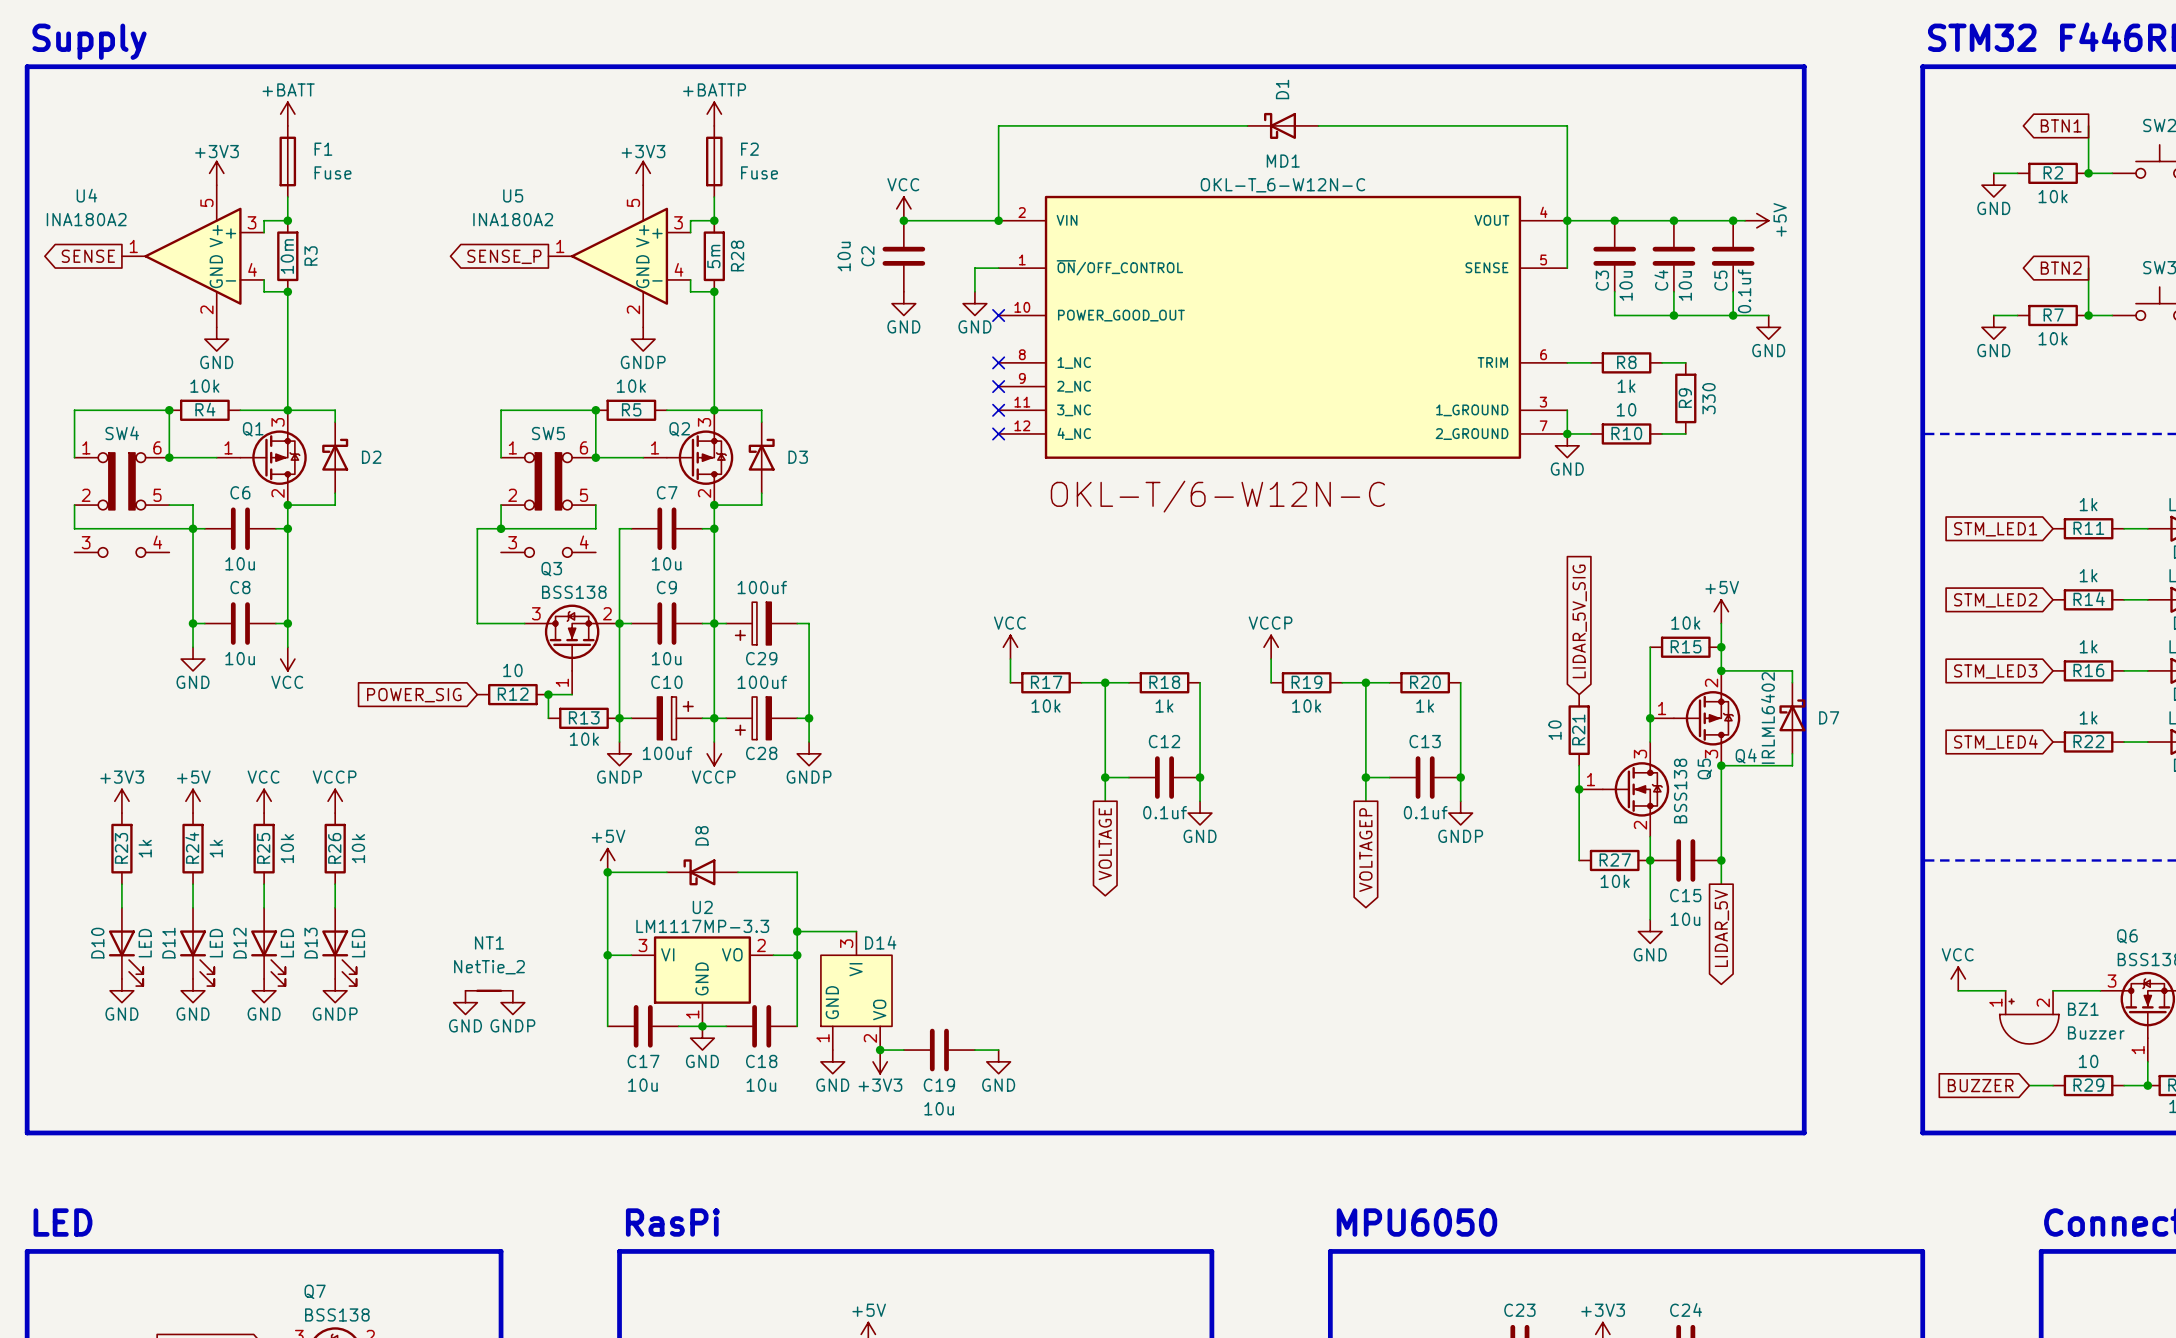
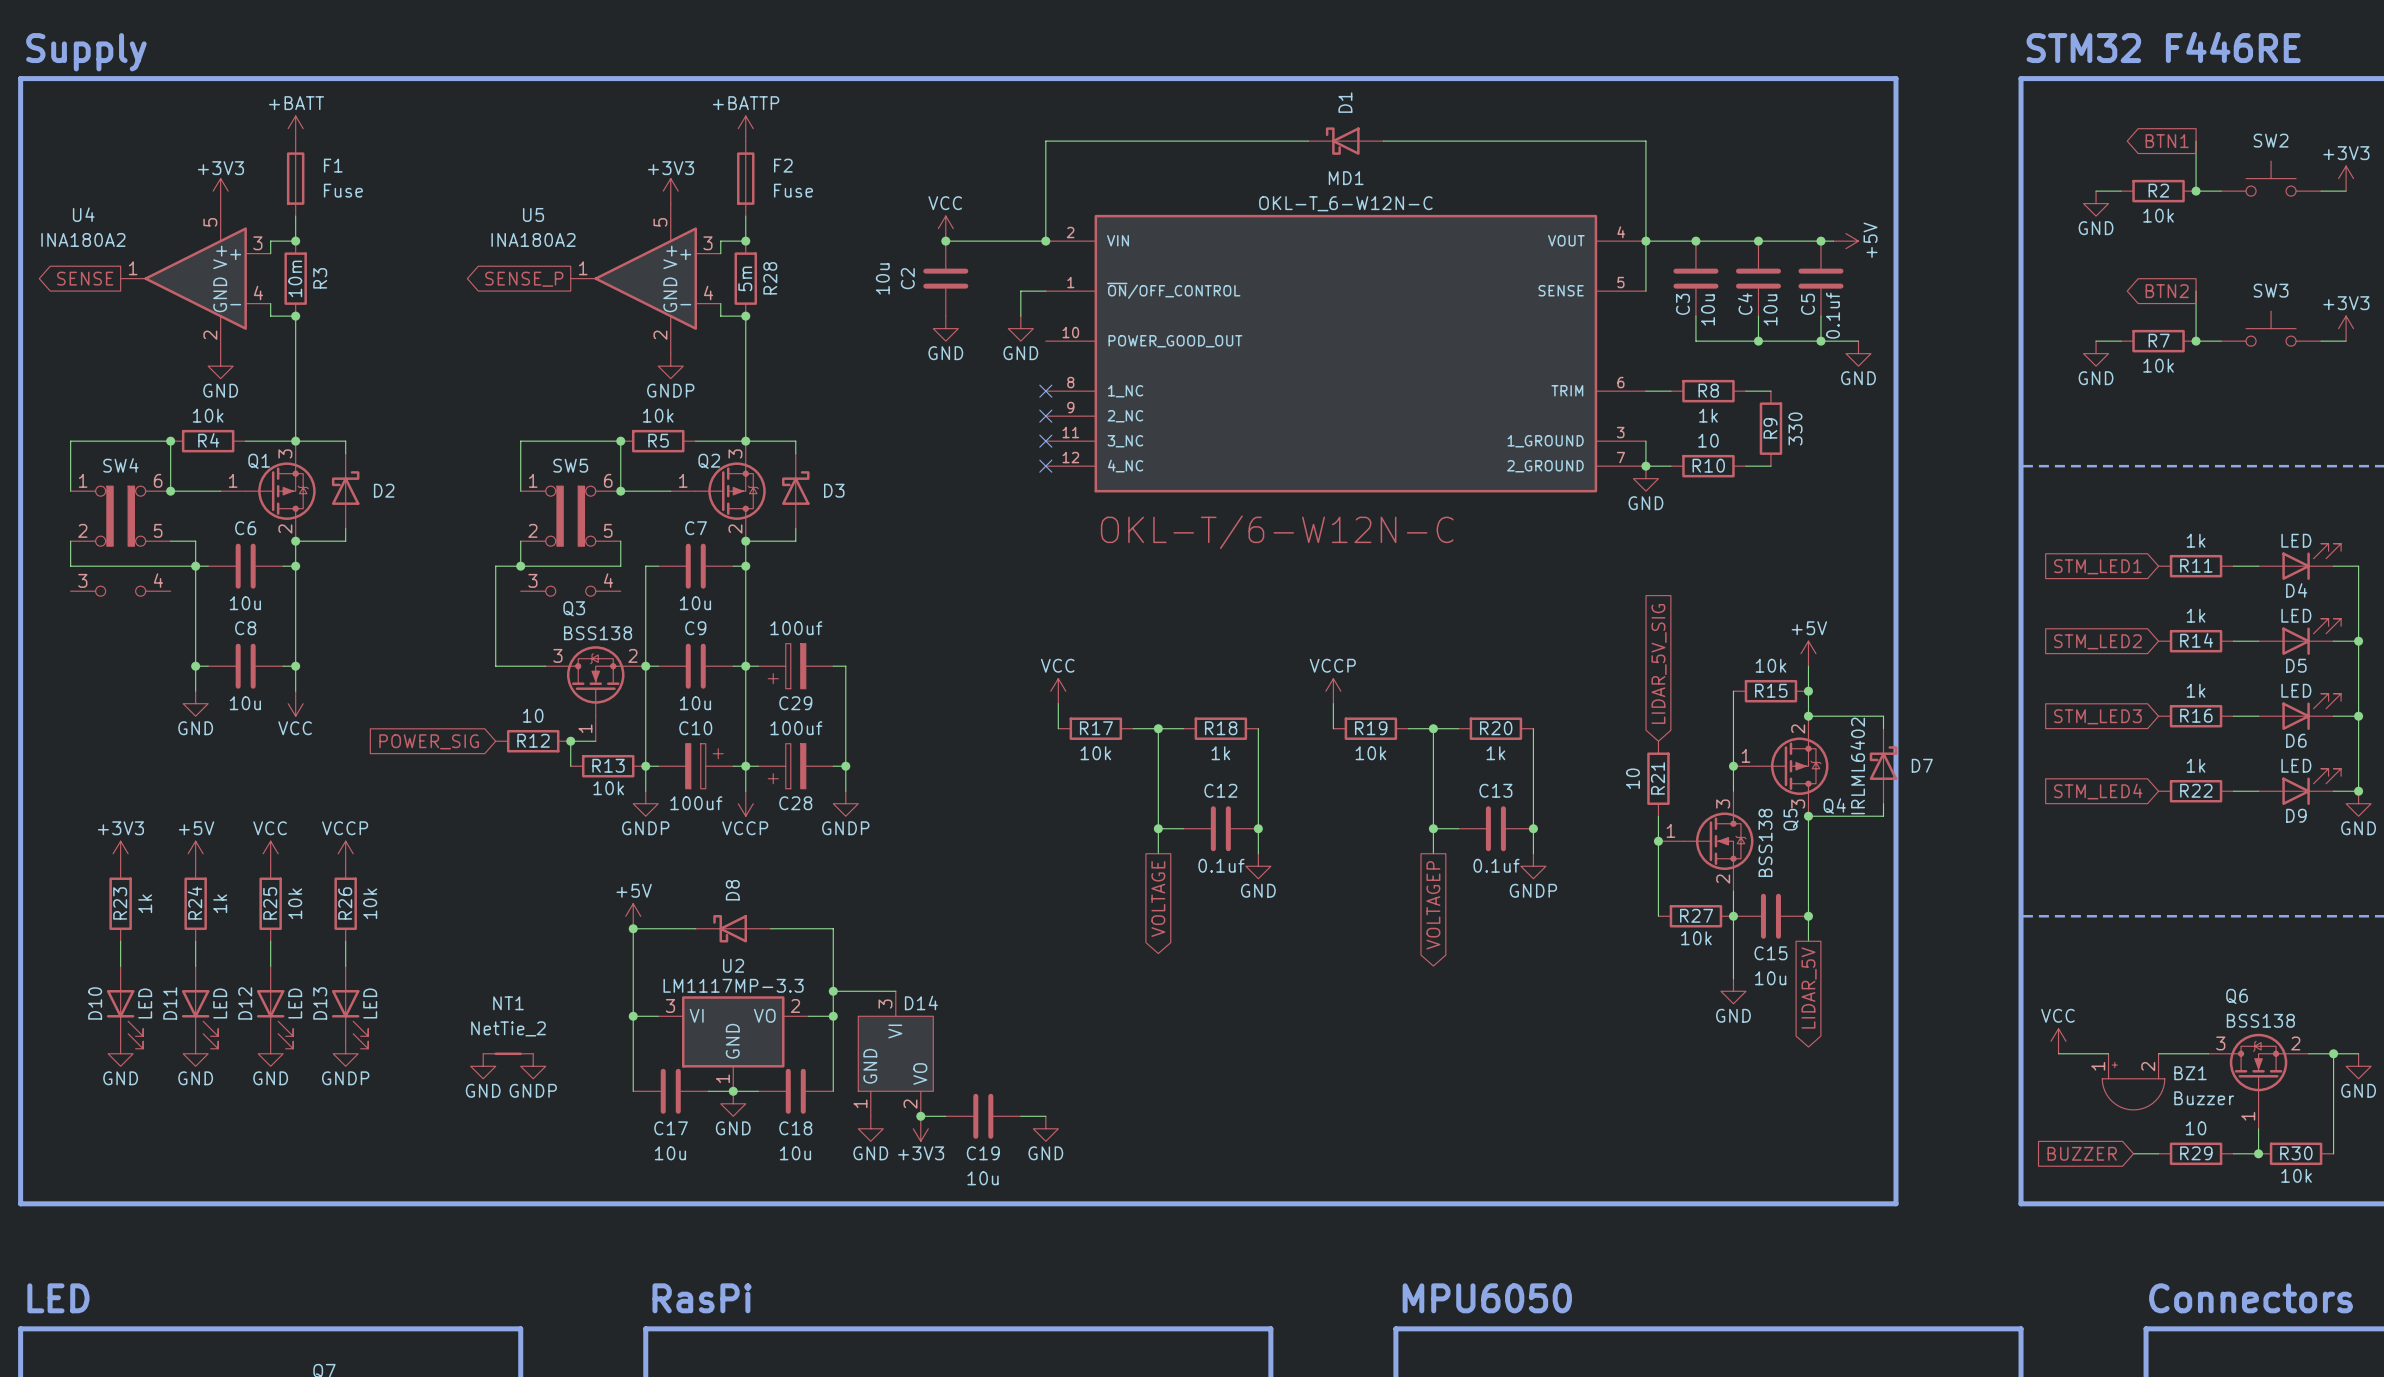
no-connect mark: (998, 315) -> none

